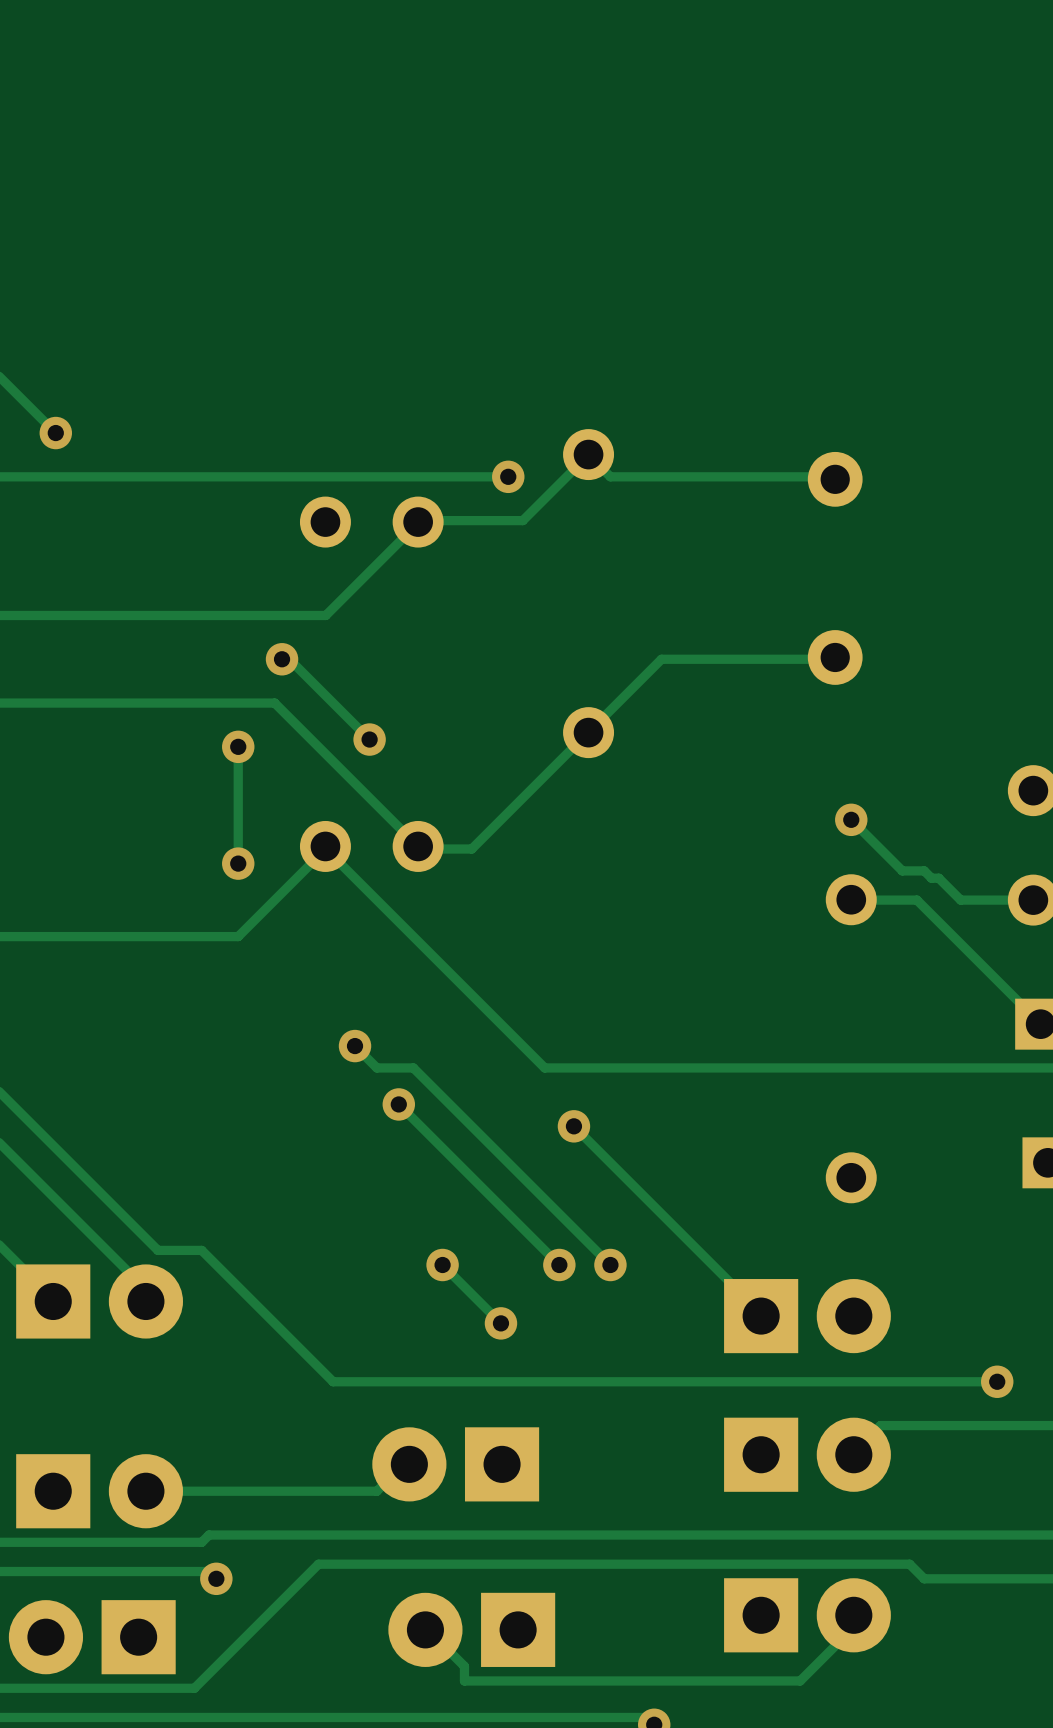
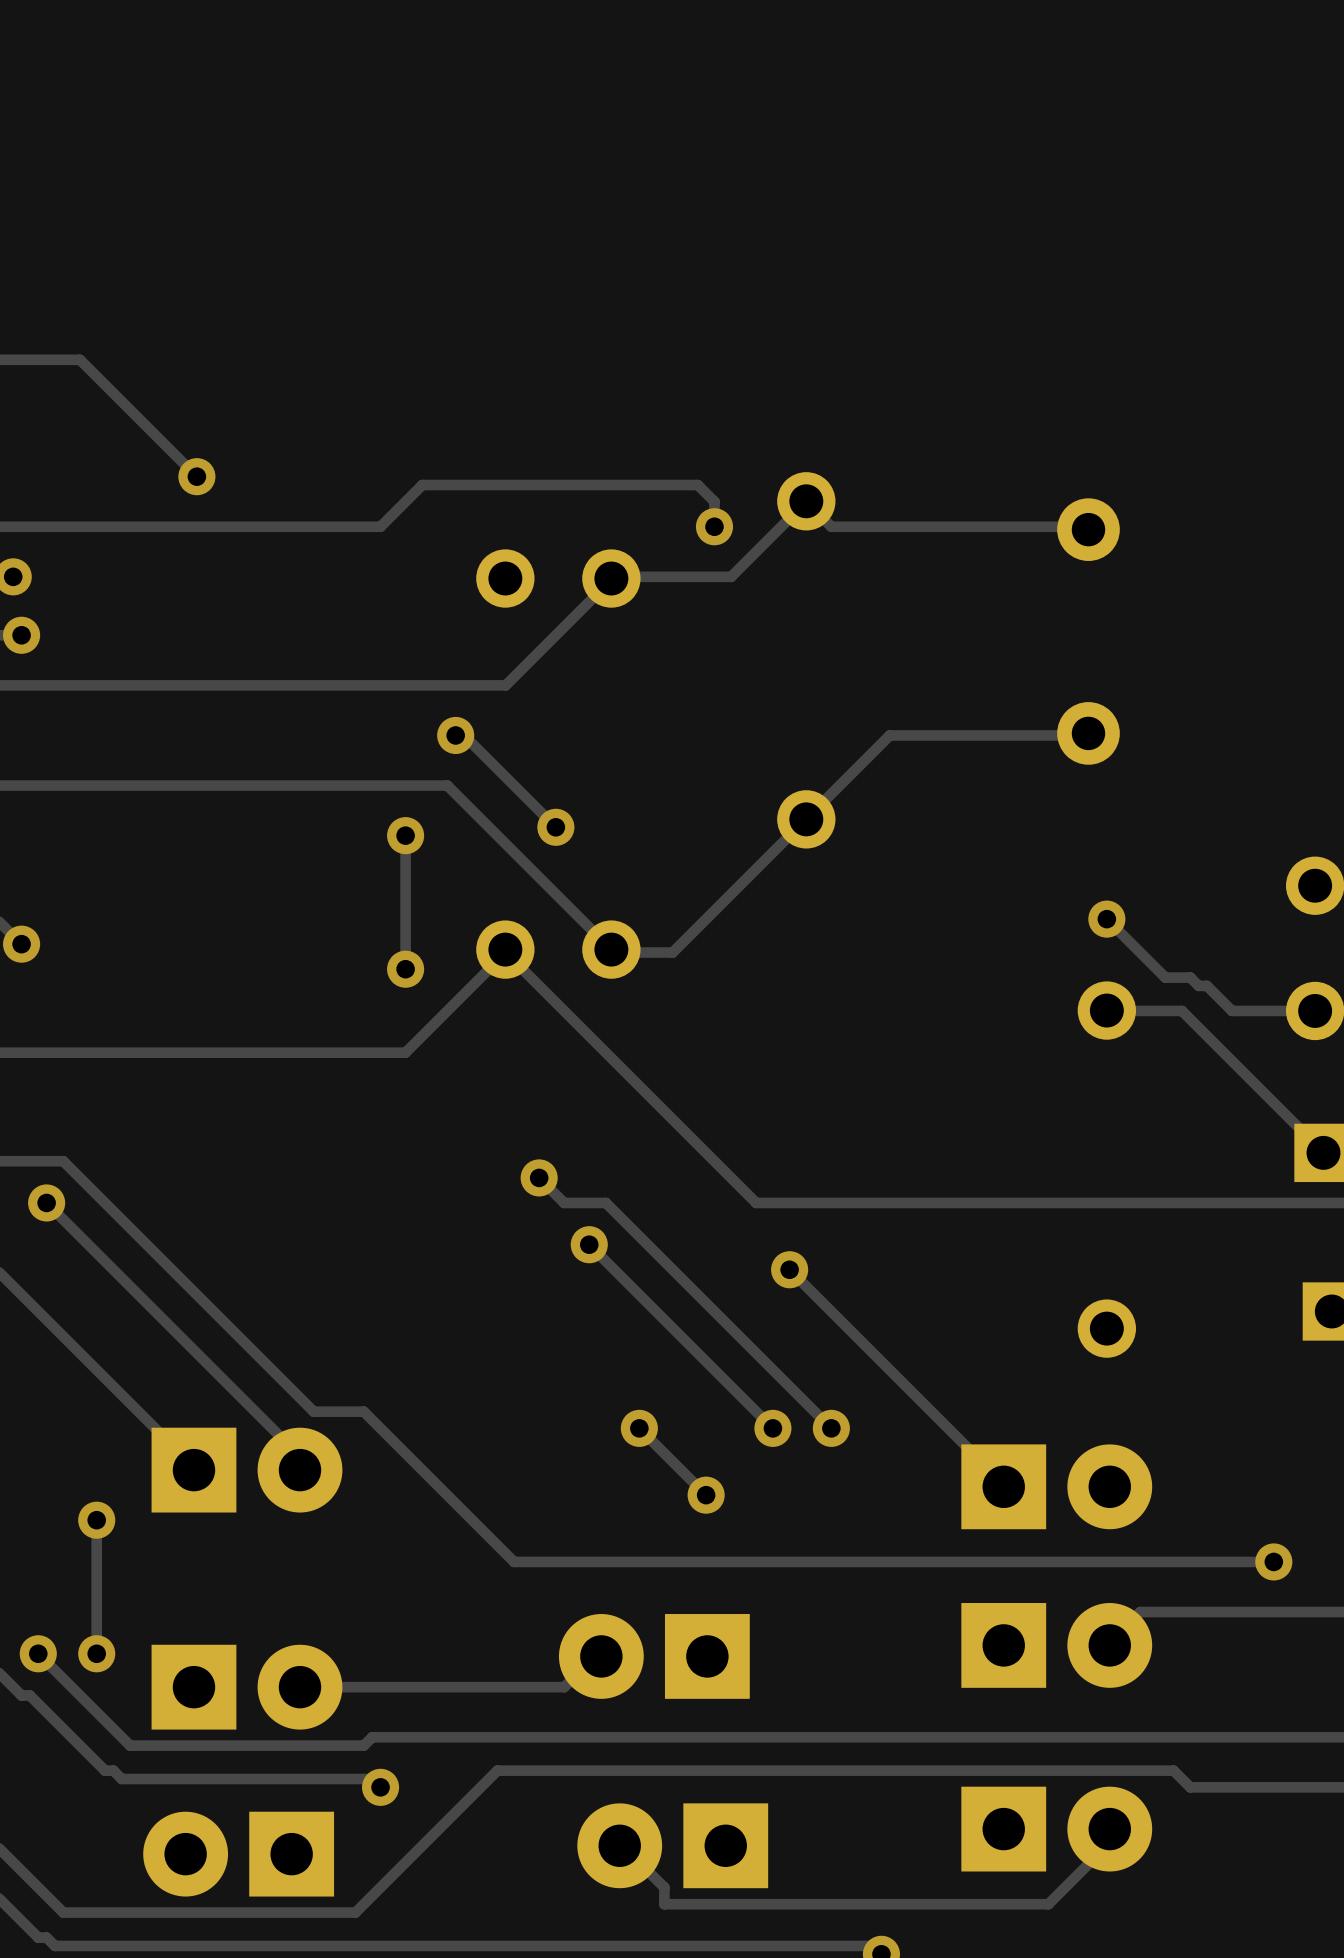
track: (508, 476) (216, 476) -> (714, 526) (714, 501) (697, 485) (422, 485) (380, 526)

